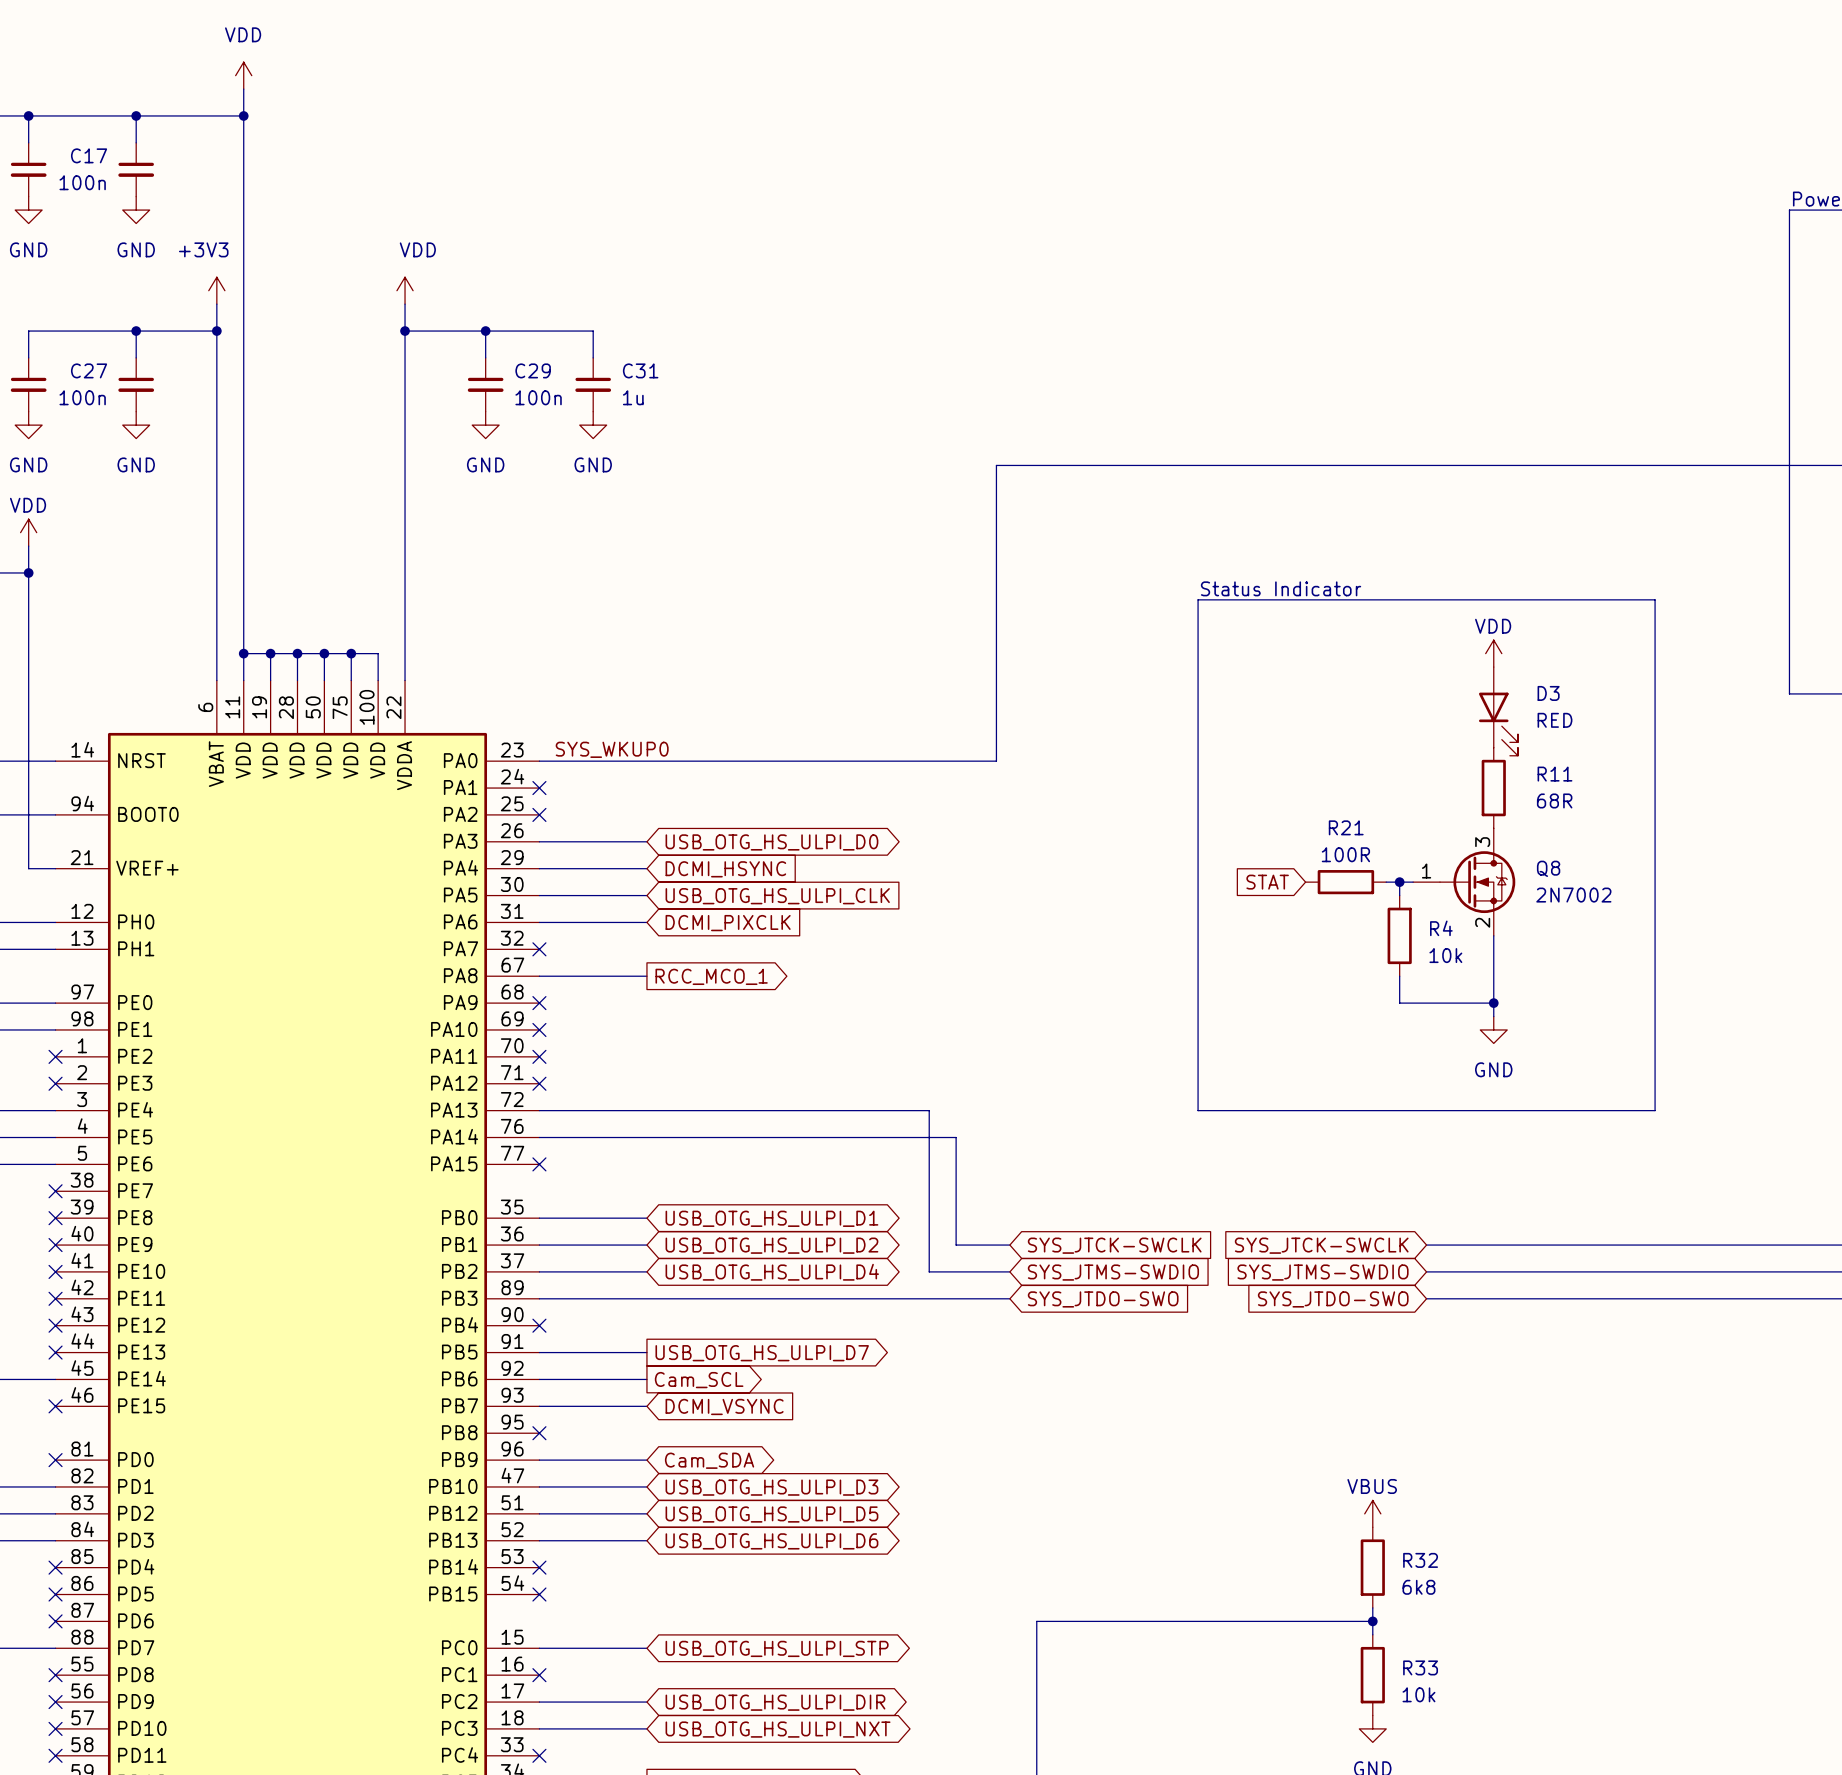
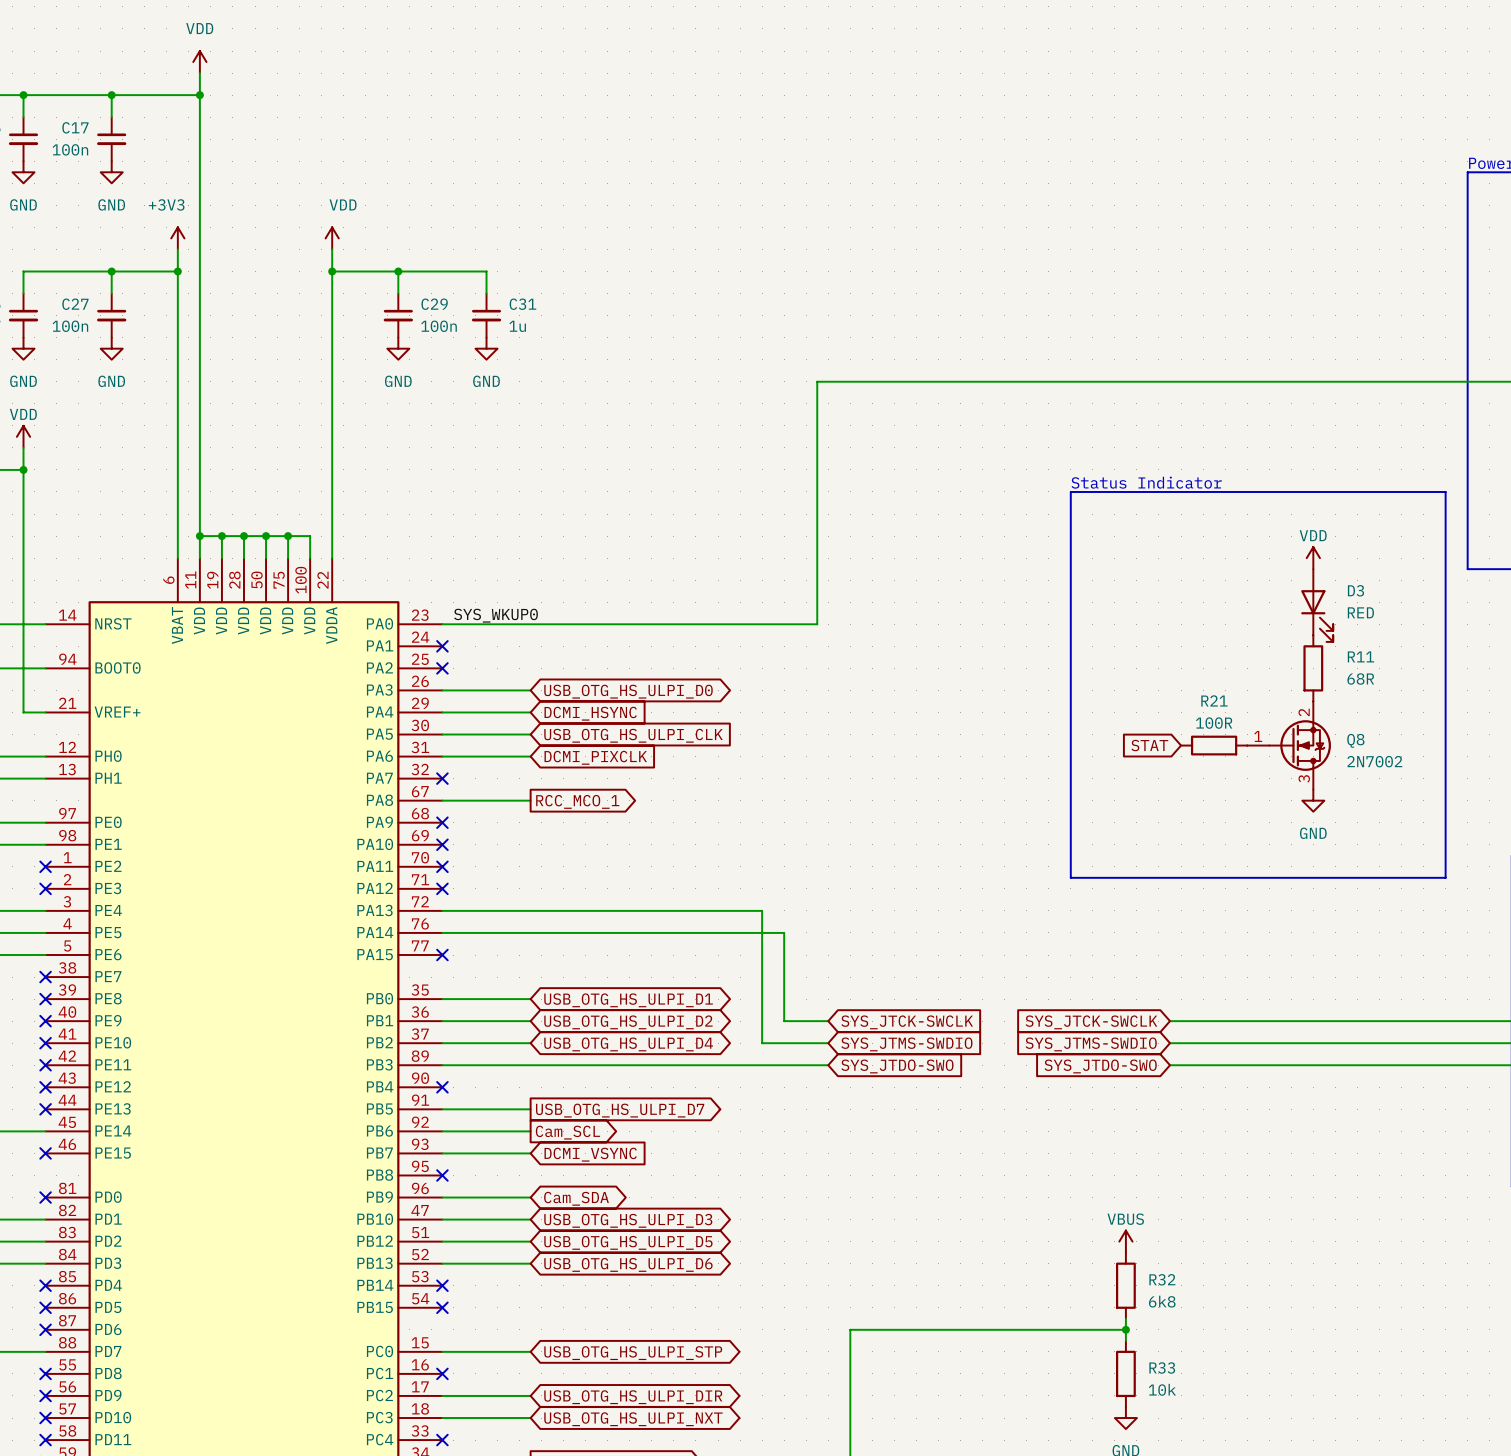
text position: Status Indicator (1281, 588) -> Status Indicator (1146, 482)
line: (1305, 599) (1198, 599) (1198, 1110) (1655, 1110) (1655, 599) -> (1070, 491) (1070, 877) (1445, 877) (1445, 491) (1357, 491)
power symbol position: VDD (1493, 653) -> VDD (1313, 558)
D3 position: (1498, 711) -> (1317, 605)
R11 position: (1493, 788) -> (1313, 668)
global label position: STAT (1267, 882) -> STAT (1149, 745)
R21 position: (1345, 882) -> (1214, 745)
wire: (1386, 882) (1413, 882) -> none
wire: (1399, 882) (1399, 895) -> none
junction: (1399, 882) -> none
Q8 position: (1464, 882) -> (1289, 745)
Q8 flip: as is (1477, 882) -> up-down (1300, 745)
R4: 10k (1399, 935) -> none
wire: (1493, 935) (1493, 1016) -> none
wire: (1399, 976) (1399, 1003) (1493, 1003) -> none
junction: (1493, 1003) -> none
power symbol position: GND (1493, 1029) -> GND (1313, 800)

